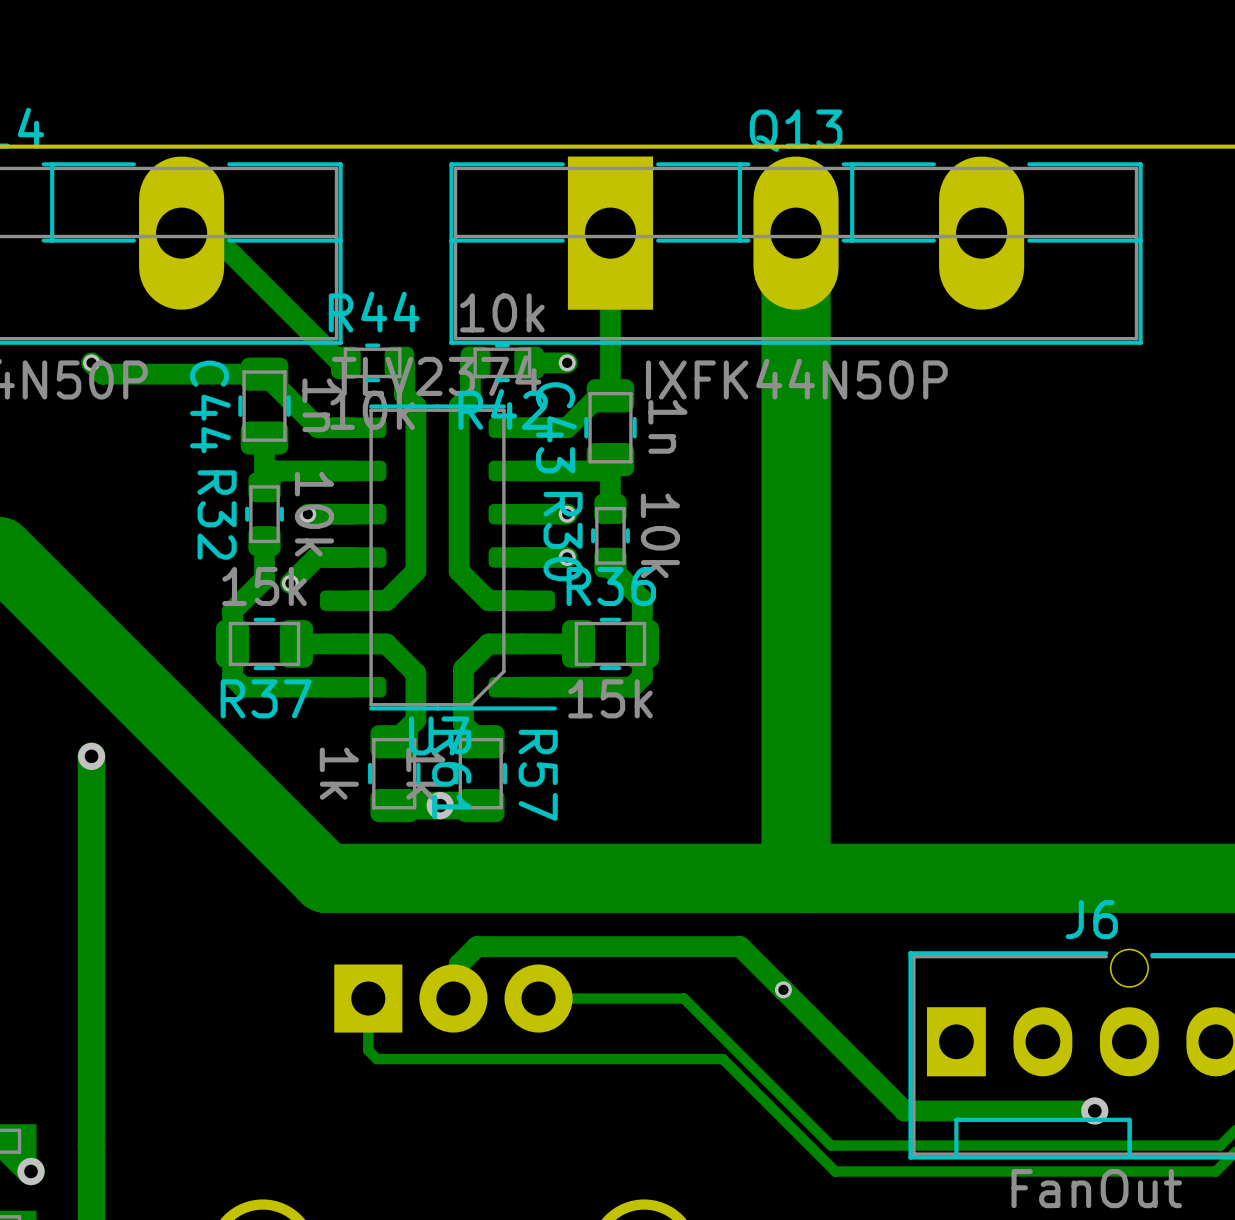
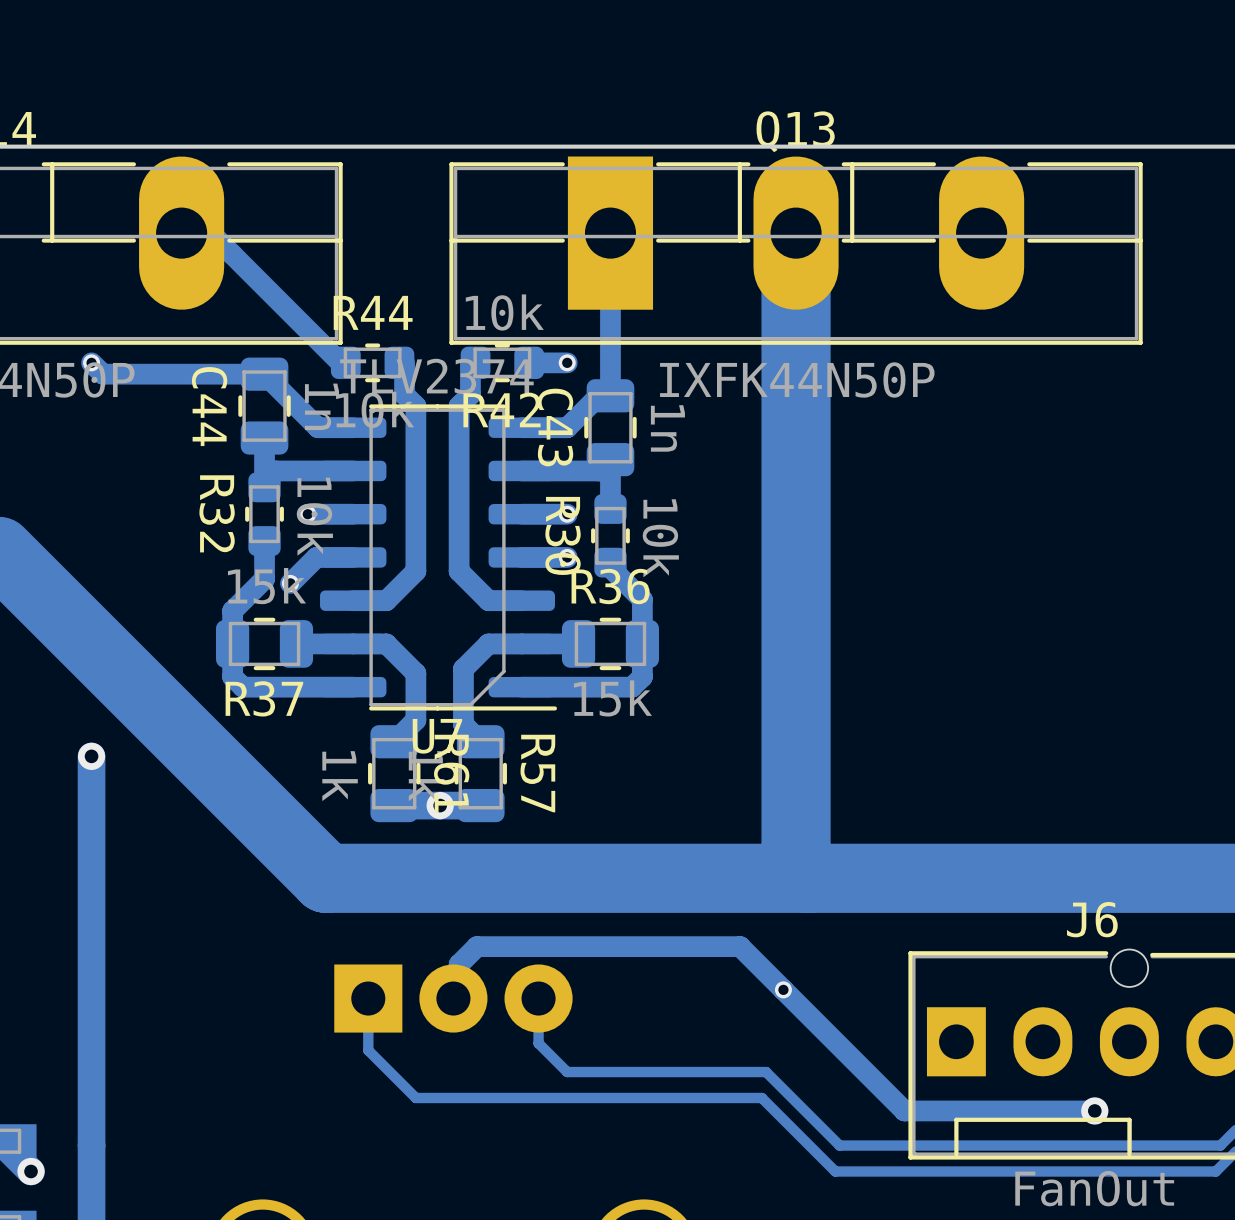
track: (538, 998) (683, 998) (831, 1145) (839, 1145) -> (538, 998) (538, 1043) (567, 1072) (766, 1072) (839, 1145)
track: (376, 1059) (722, 1059) (761, 1097) -> (376, 1059) (415, 1097) (761, 1097)

